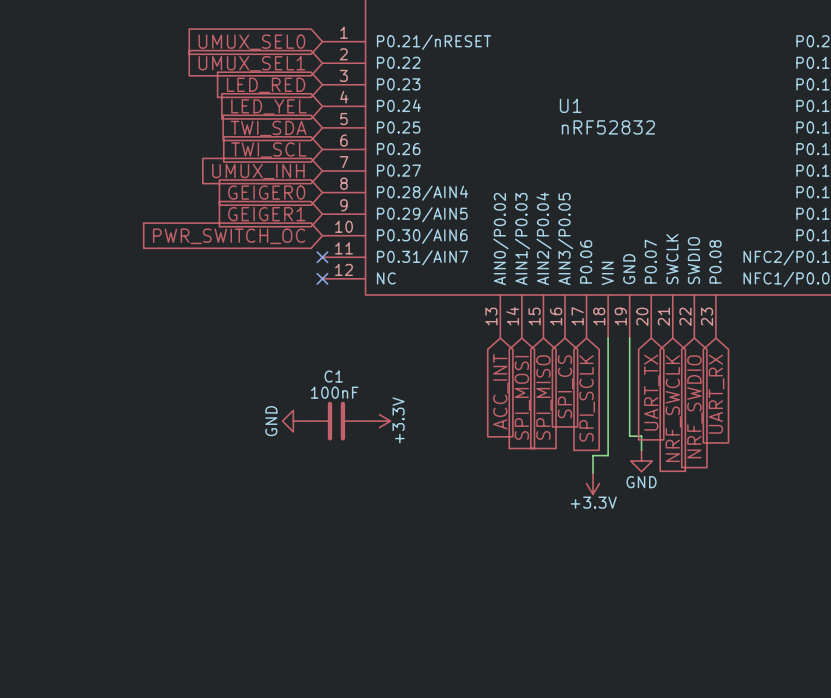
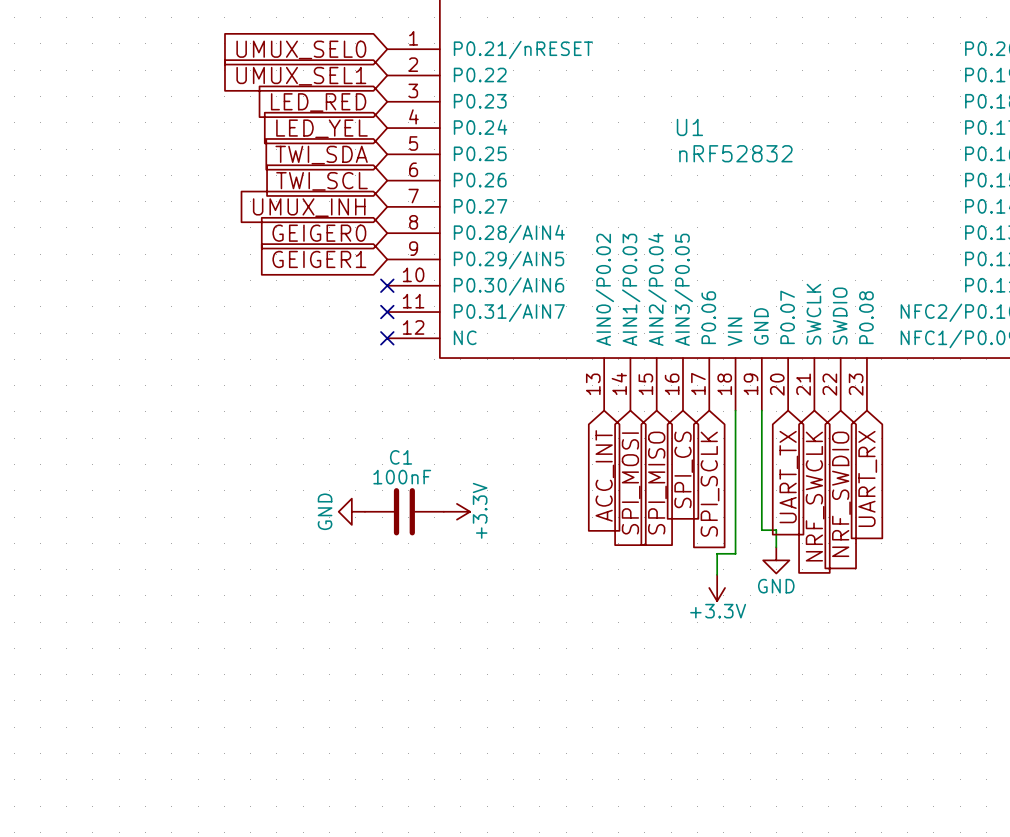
no-connect mark: none -> (387, 285)
global label: PWR_SWITCH_OC (229, 236) -> none

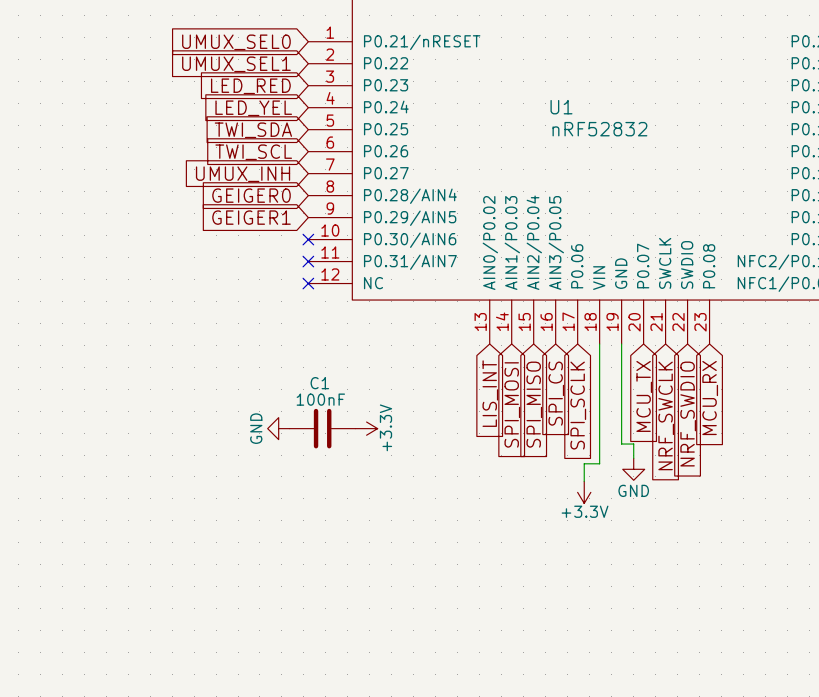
global label: ACC_INT (604, 475) -> LIS_INT (490, 393)
global label: UART_TX (788, 477) -> MCU_TX (644, 396)
global label: UART_RX (867, 478) -> MCU_RX (710, 398)

